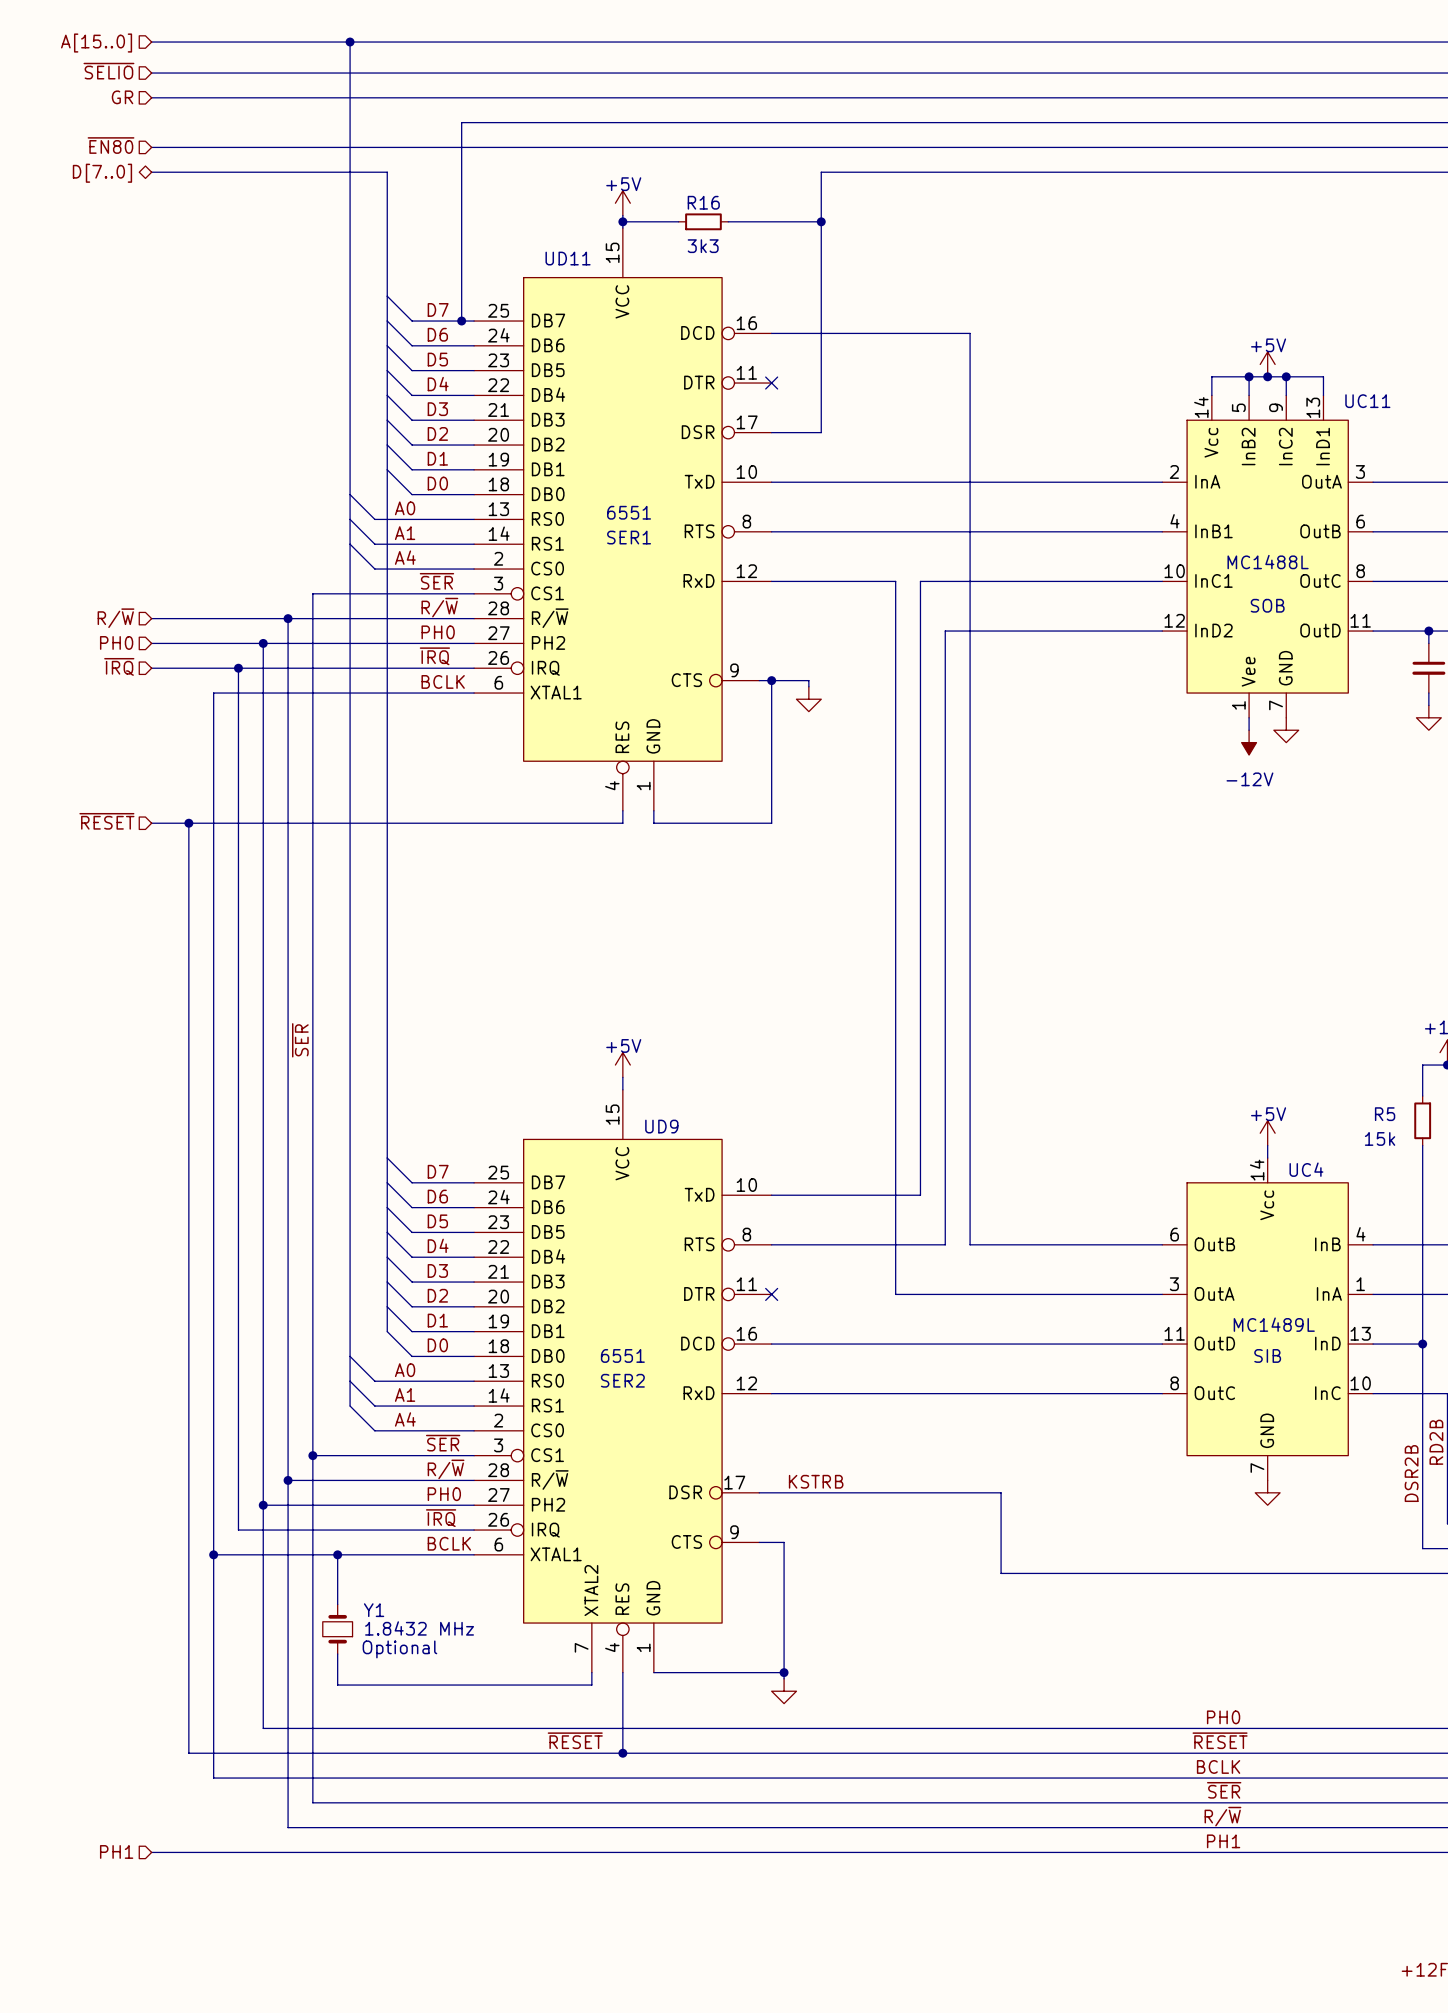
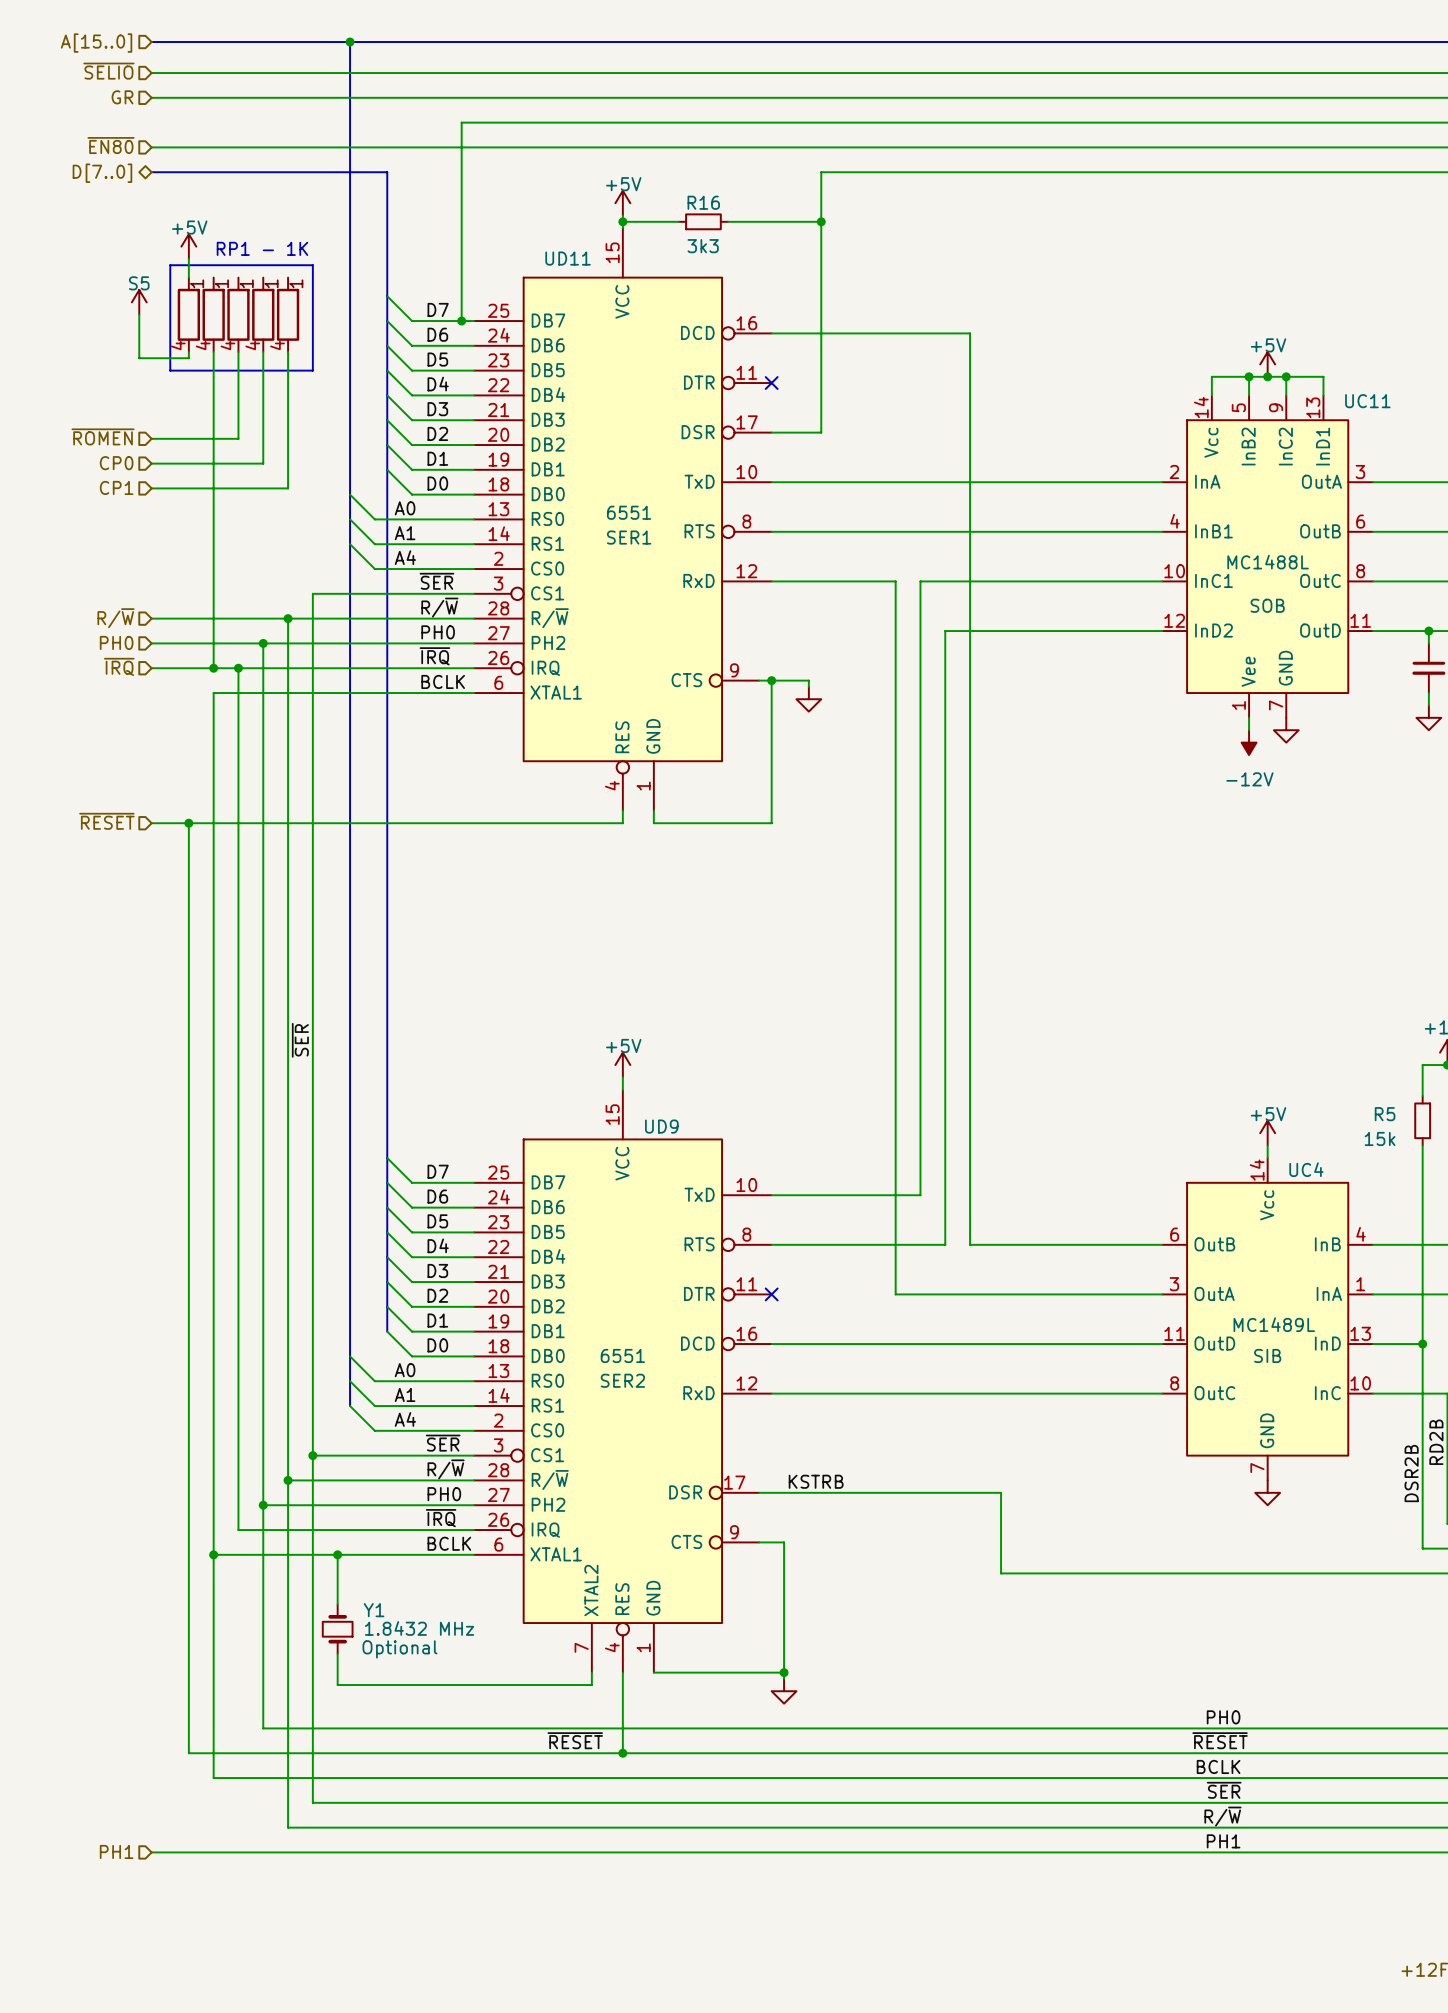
power symbol: none -> +5V (188, 246)
text: none -> RP1 - 1K (262, 248)
wire: none -> (188, 259) (188, 277)
line: none -> (170, 265) (312, 265) (312, 370) (170, 370) (170, 265)
power symbol: none -> S5 (139, 302)
wire: none -> (139, 314) (139, 358) (188, 358) (188, 352)
part: none -> (188, 314)
part: none -> (213, 314)
part: none -> (238, 314)
part: none -> (263, 314)
part: none -> (288, 314)
wire: none -> (213, 352) (213, 668)
wire: none -> (238, 352) (238, 438) (151, 438)
wire: none -> (263, 352) (263, 463) (151, 463)
wire: none -> (288, 352) (288, 488) (151, 488)
hierarchical label: none -> ~{ROMEN} (103, 436)
hierarchical label: none -> CP0 (116, 463)
hierarchical label: none -> CP1 (116, 487)
junction: none -> (213, 668)

